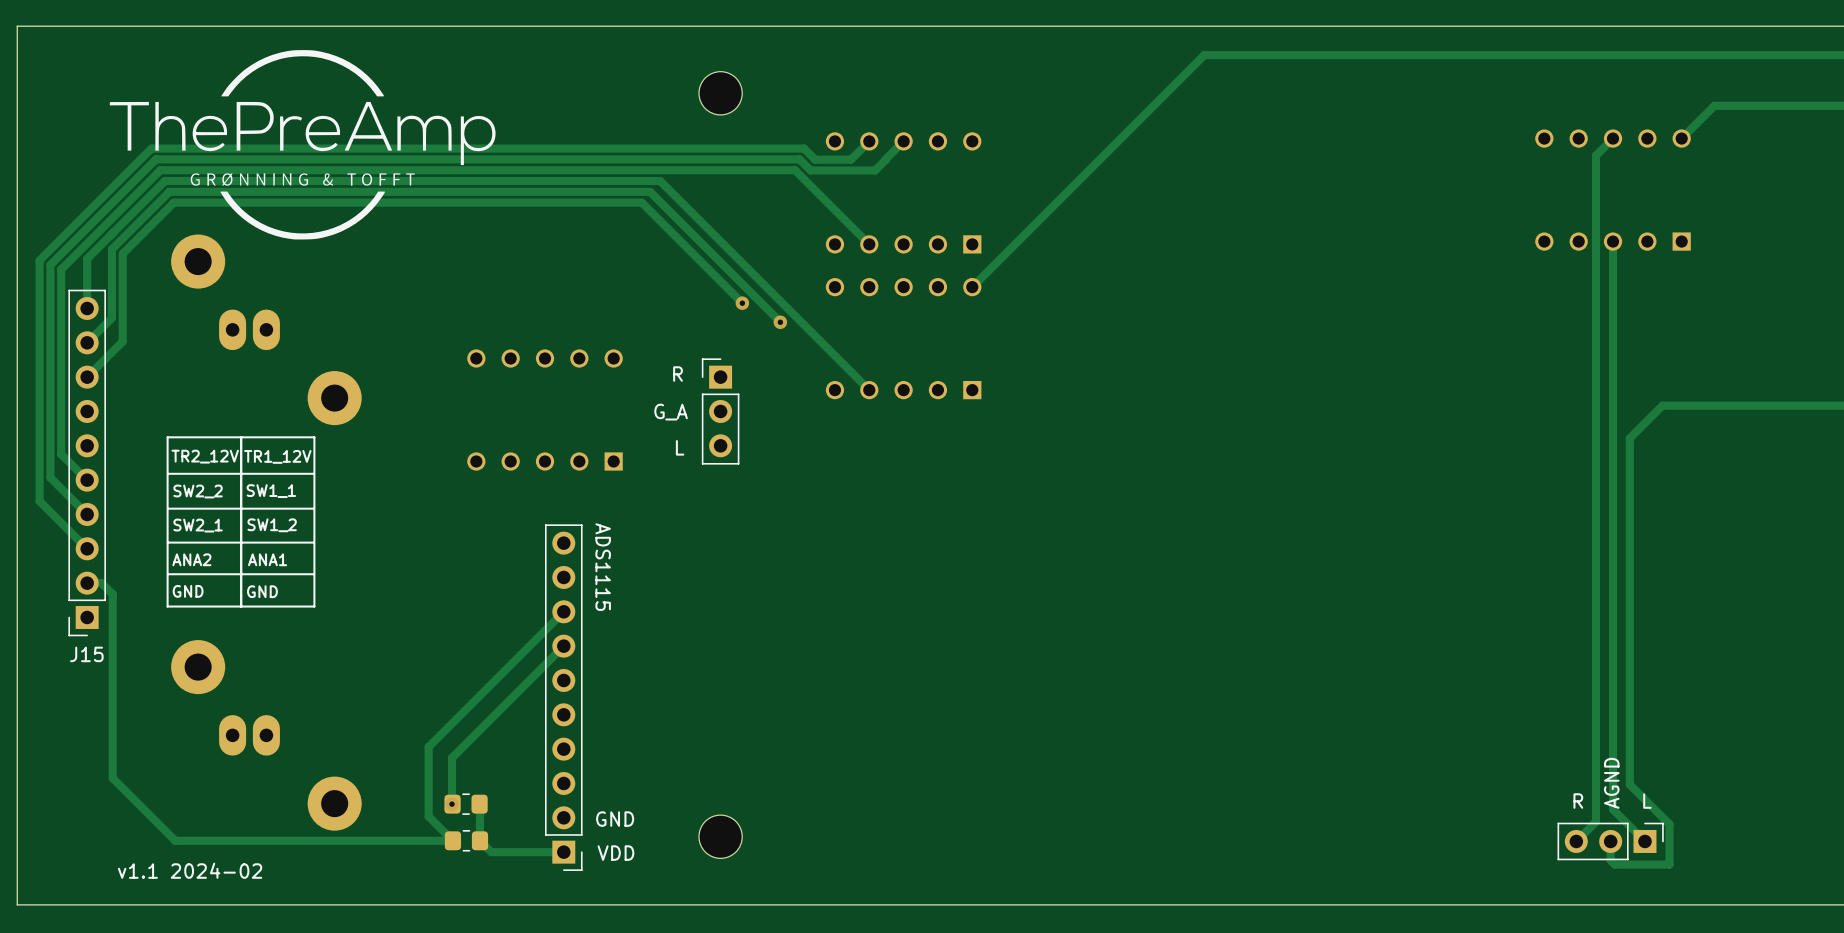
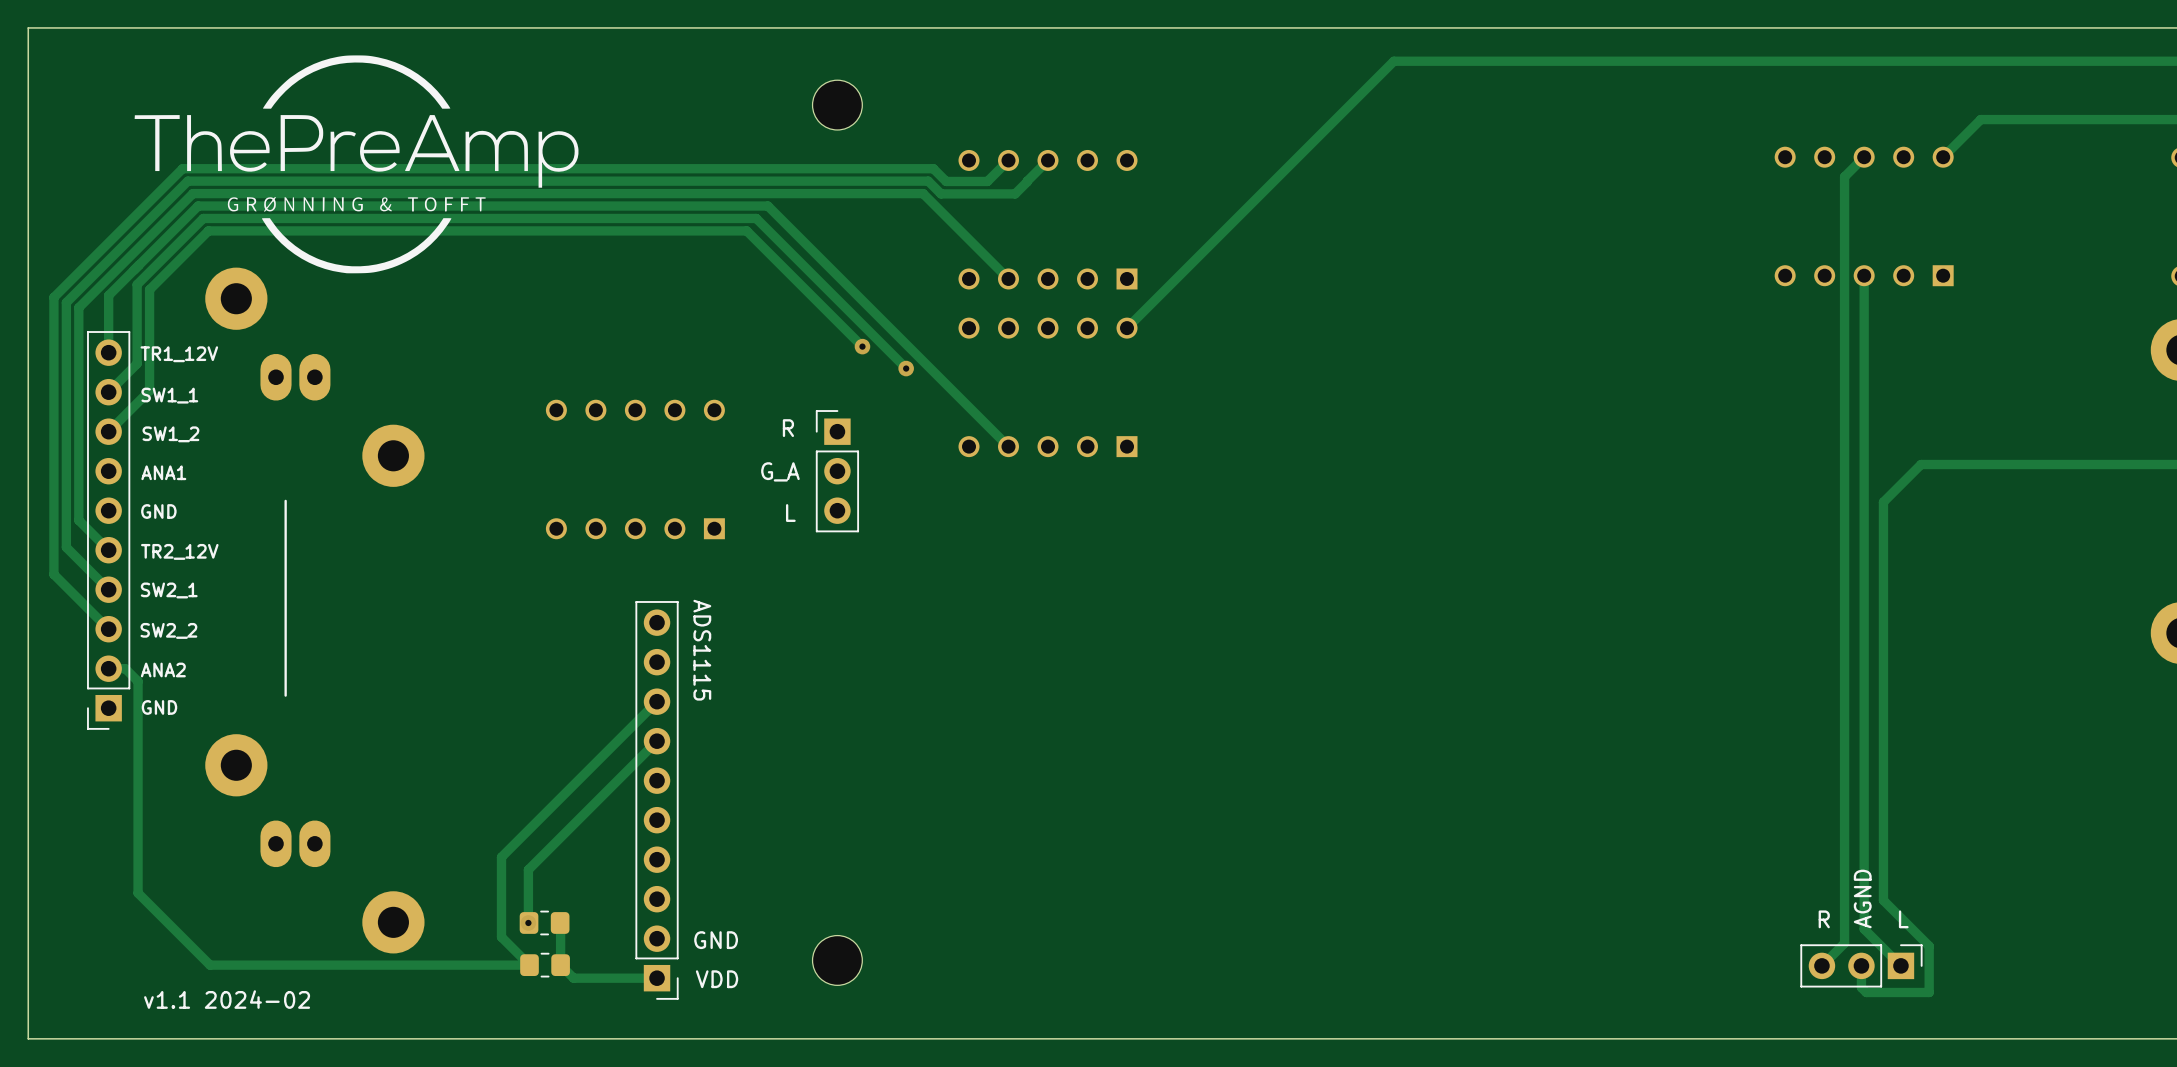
line: (314, 437) (167, 437) (167, 606) (314, 606) (314, 437) -> none
text: none -> GND (158, 511)
text position: TR2_12V (205, 456) -> TR2_12V (179, 551)
text position: TR1_12V (277, 456) -> TR1_12V (179, 354)
line: (313, 473) (168, 473) -> none
text position: SW2_2 (198, 491) -> SW2_2 (168, 630)
text position: SW1_1 (271, 491) -> SW1_1 (169, 395)
line: (313, 508) (168, 508) -> none
text position: SW2_1 (198, 525) -> SW2_1 (169, 590)
text position: SW1_2 (272, 525) -> SW1_2 (170, 434)
line: (313, 542) (167, 542) -> none
text position: ANA2 (191, 559) -> ANA2 (163, 669)
text position: ANA1 (267, 559) -> ANA1 (163, 472)
line: (314, 574) (168, 574) -> none
text position: GND (188, 591) -> GND (159, 707)
text: GND (262, 591) -> none
J15 name: J15 (86, 654) -> none

